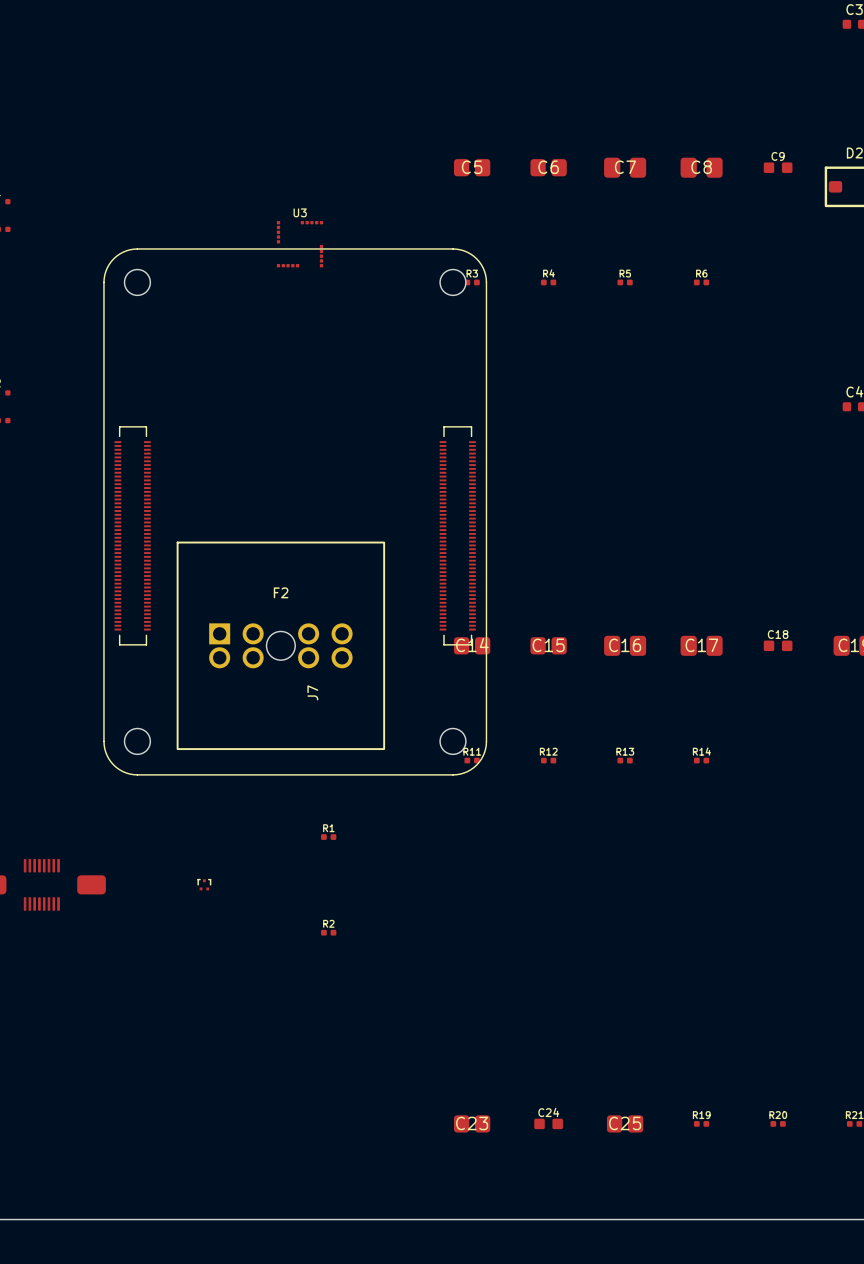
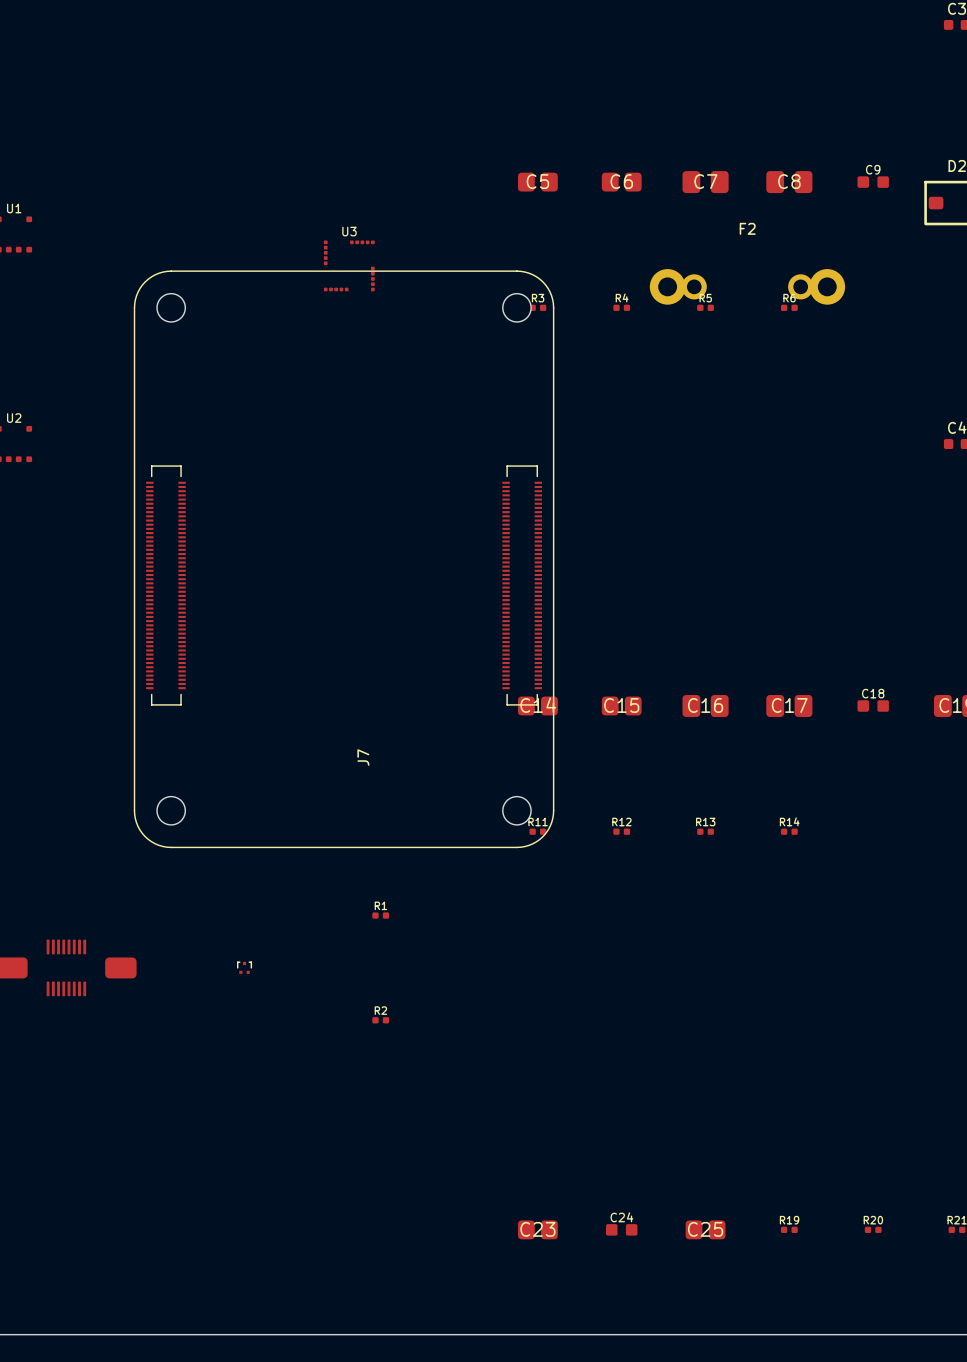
F2 footprint: [176, 541, 386, 751] -> [649, 269, 846, 305]

